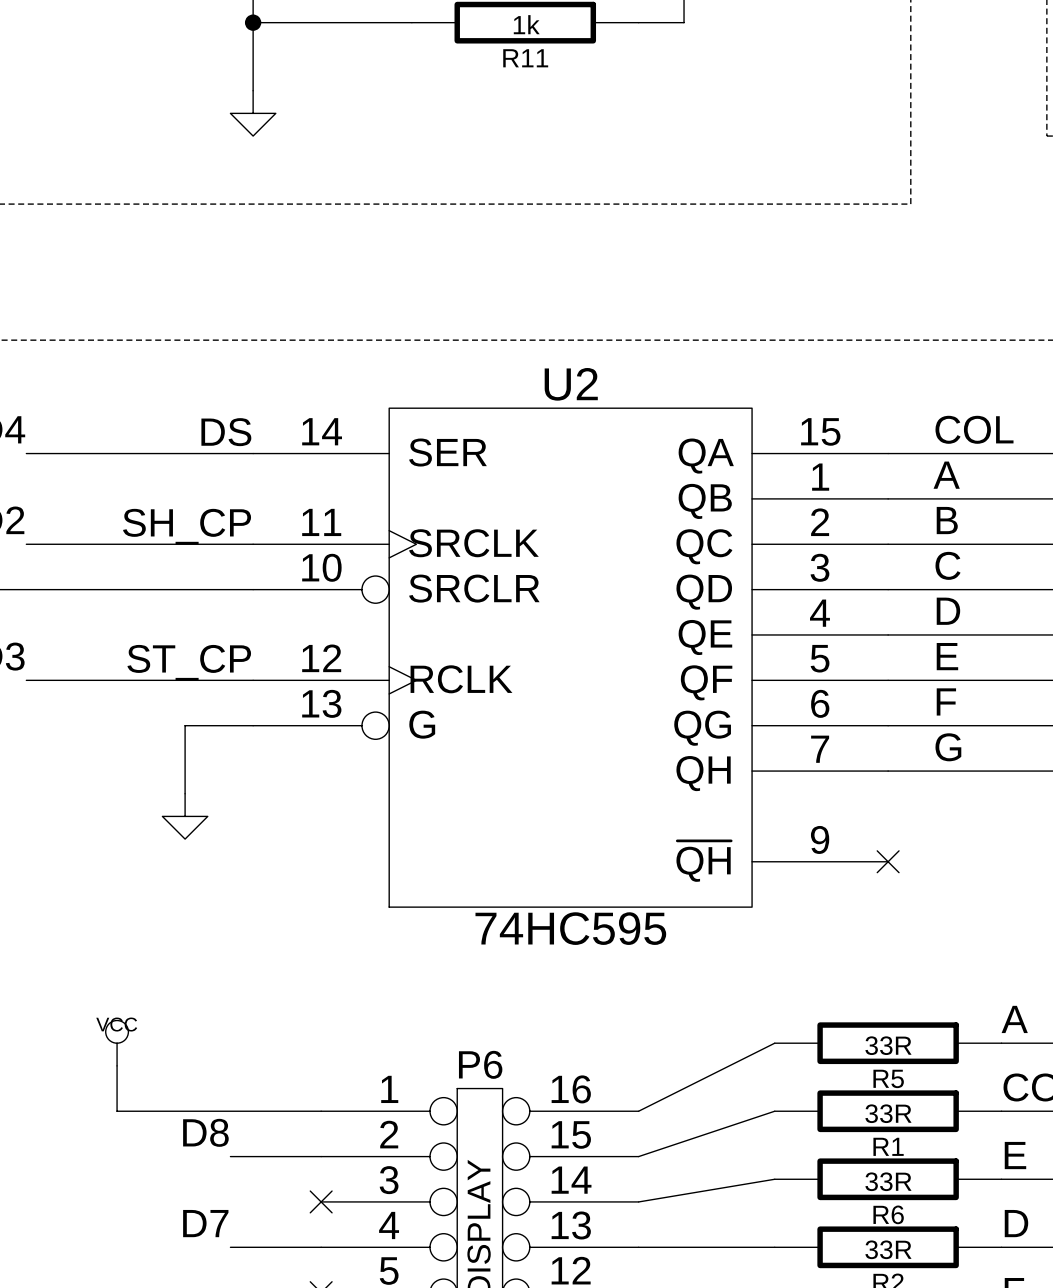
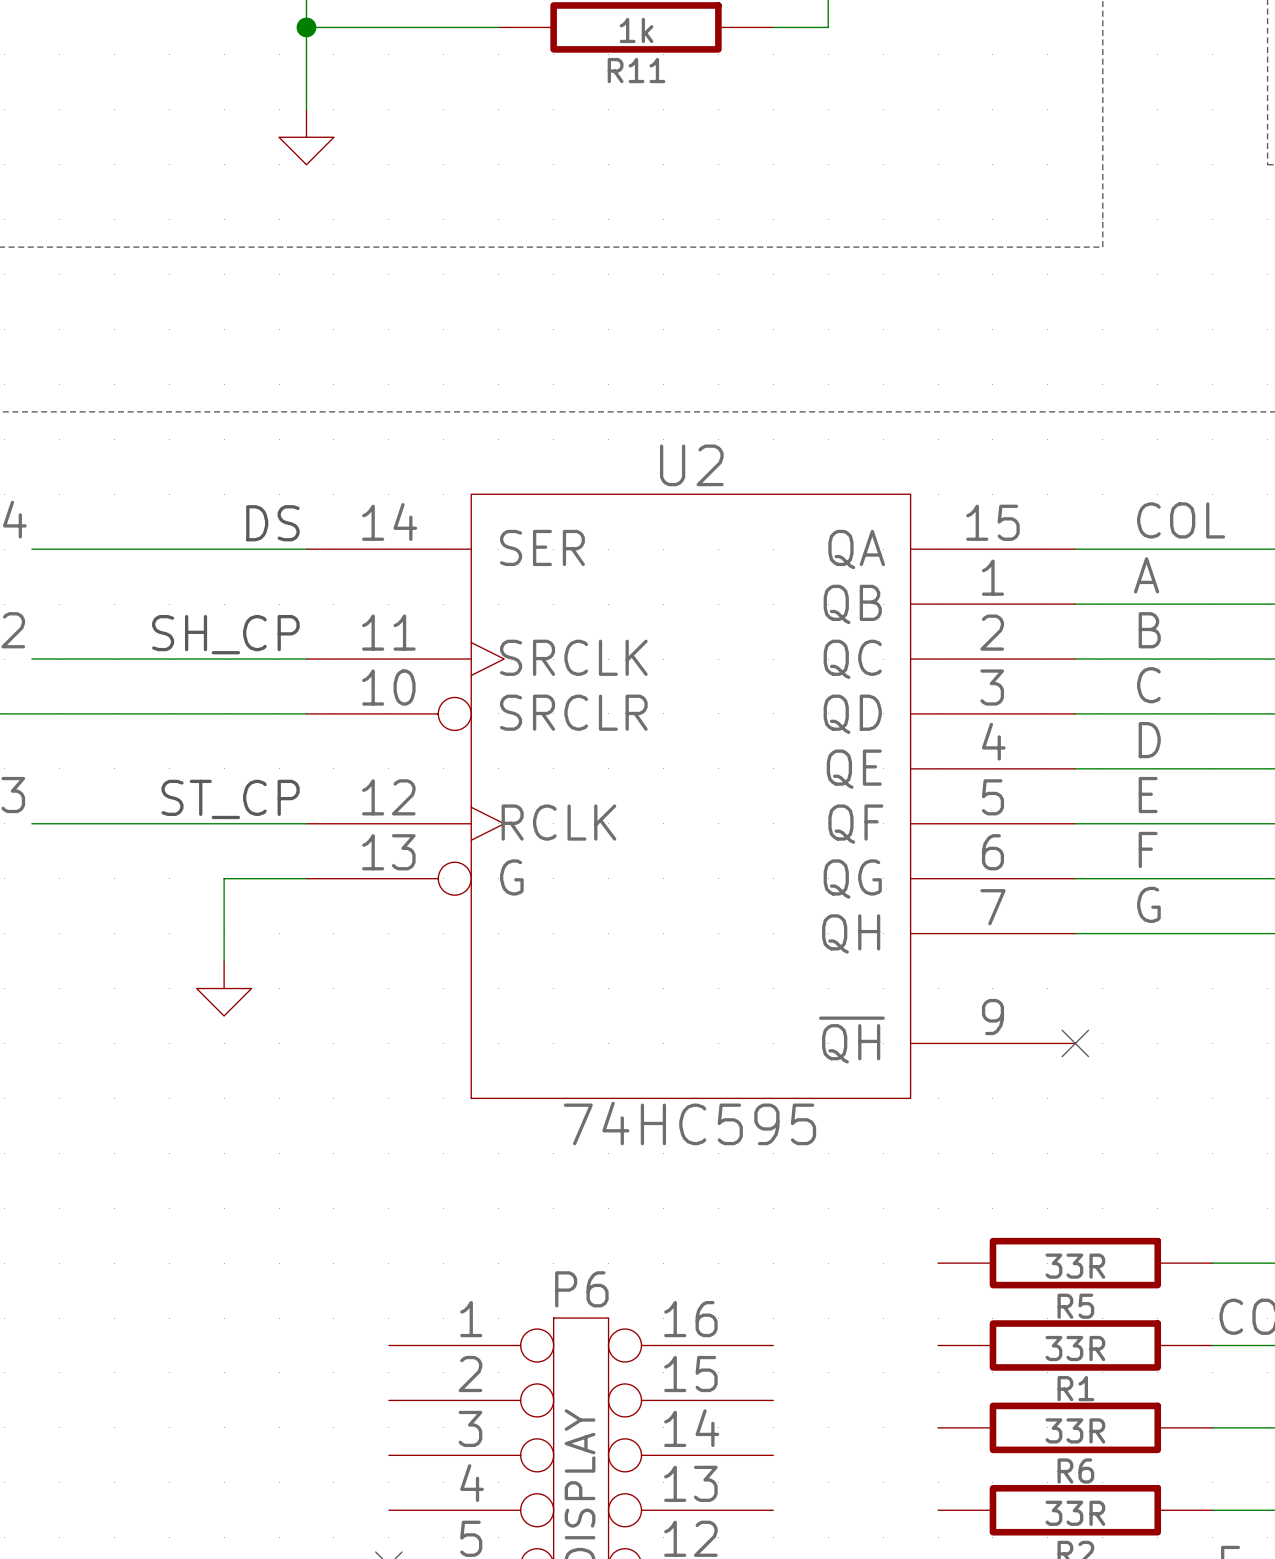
label: A (1014, 1019) -> none
power symbol: VCC (117, 1043) -> none
wire: (774, 1043) (638, 1111) -> none
wire: (117, 1065) (117, 1111) (321, 1111) -> none
wire: (774, 1111) (638, 1156) -> none
label: D8 (205, 1132) -> none
label: E (1015, 1155) -> none
wire: (230, 1156) (321, 1156) -> none
wire: (774, 1179) (638, 1201) -> none
no-connect mark: (321, 1201) -> none
label: D7 (205, 1223) -> none
label: D (1016, 1223) -> none
wire: (230, 1247) (321, 1247) -> none
wire: (638, 1247) (774, 1247) -> none

